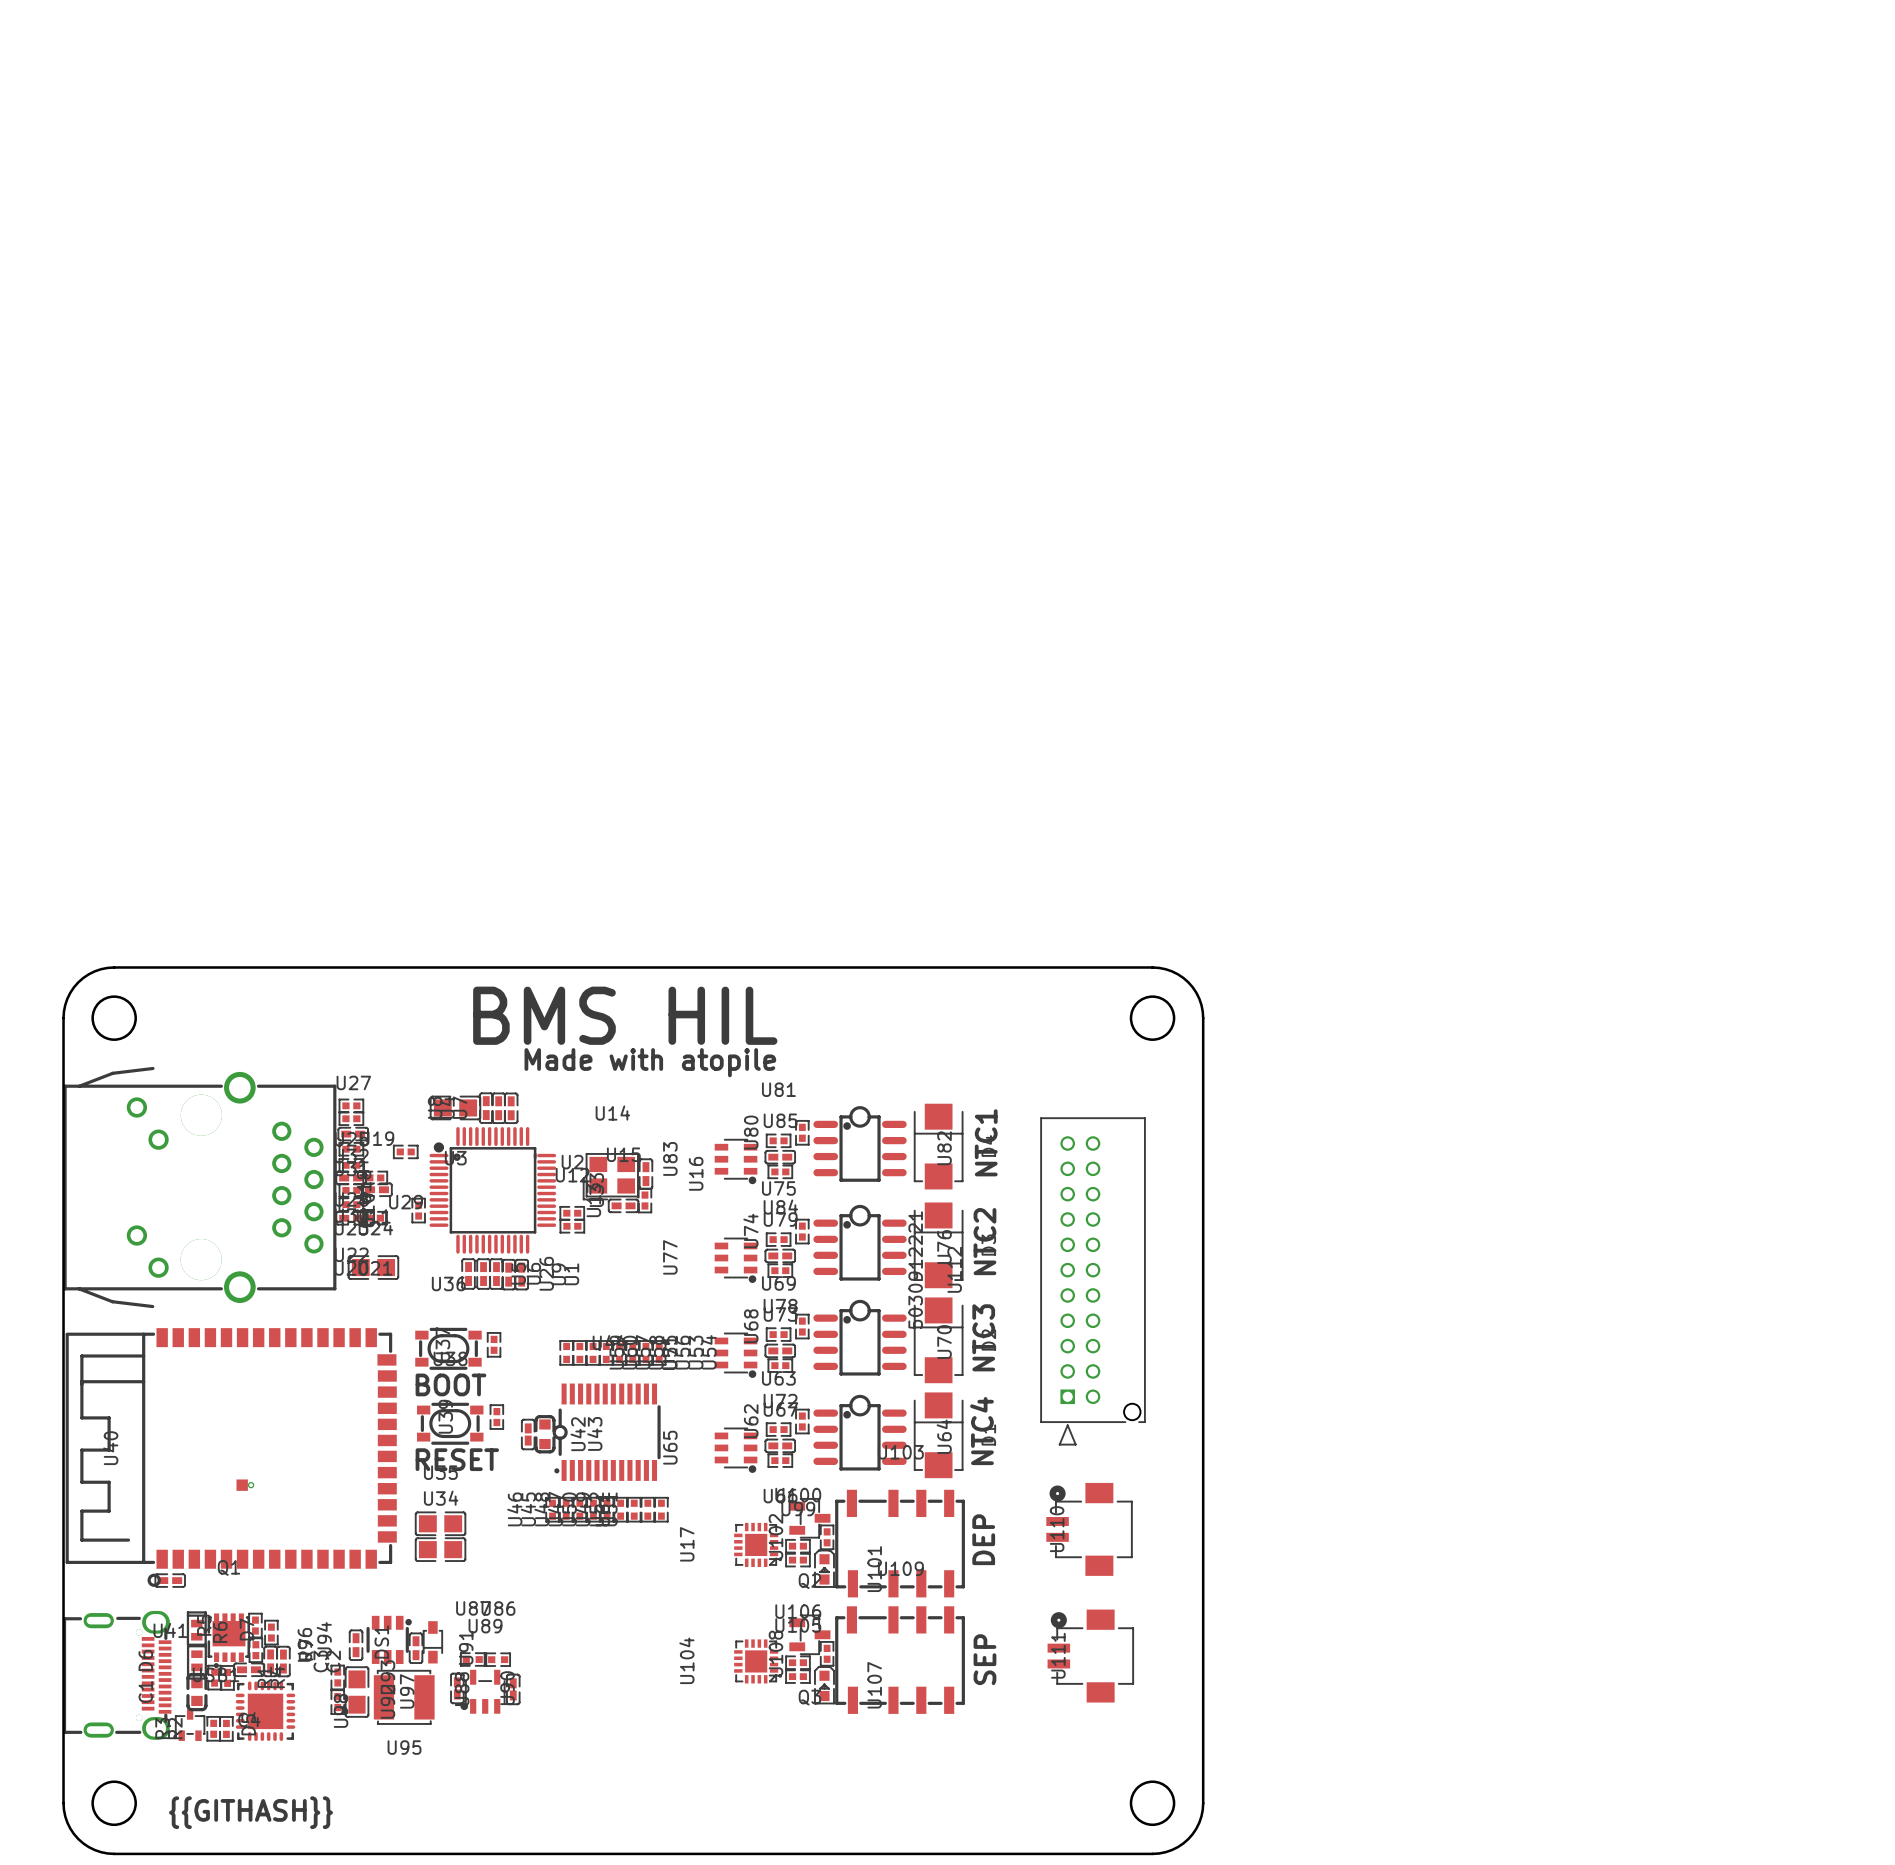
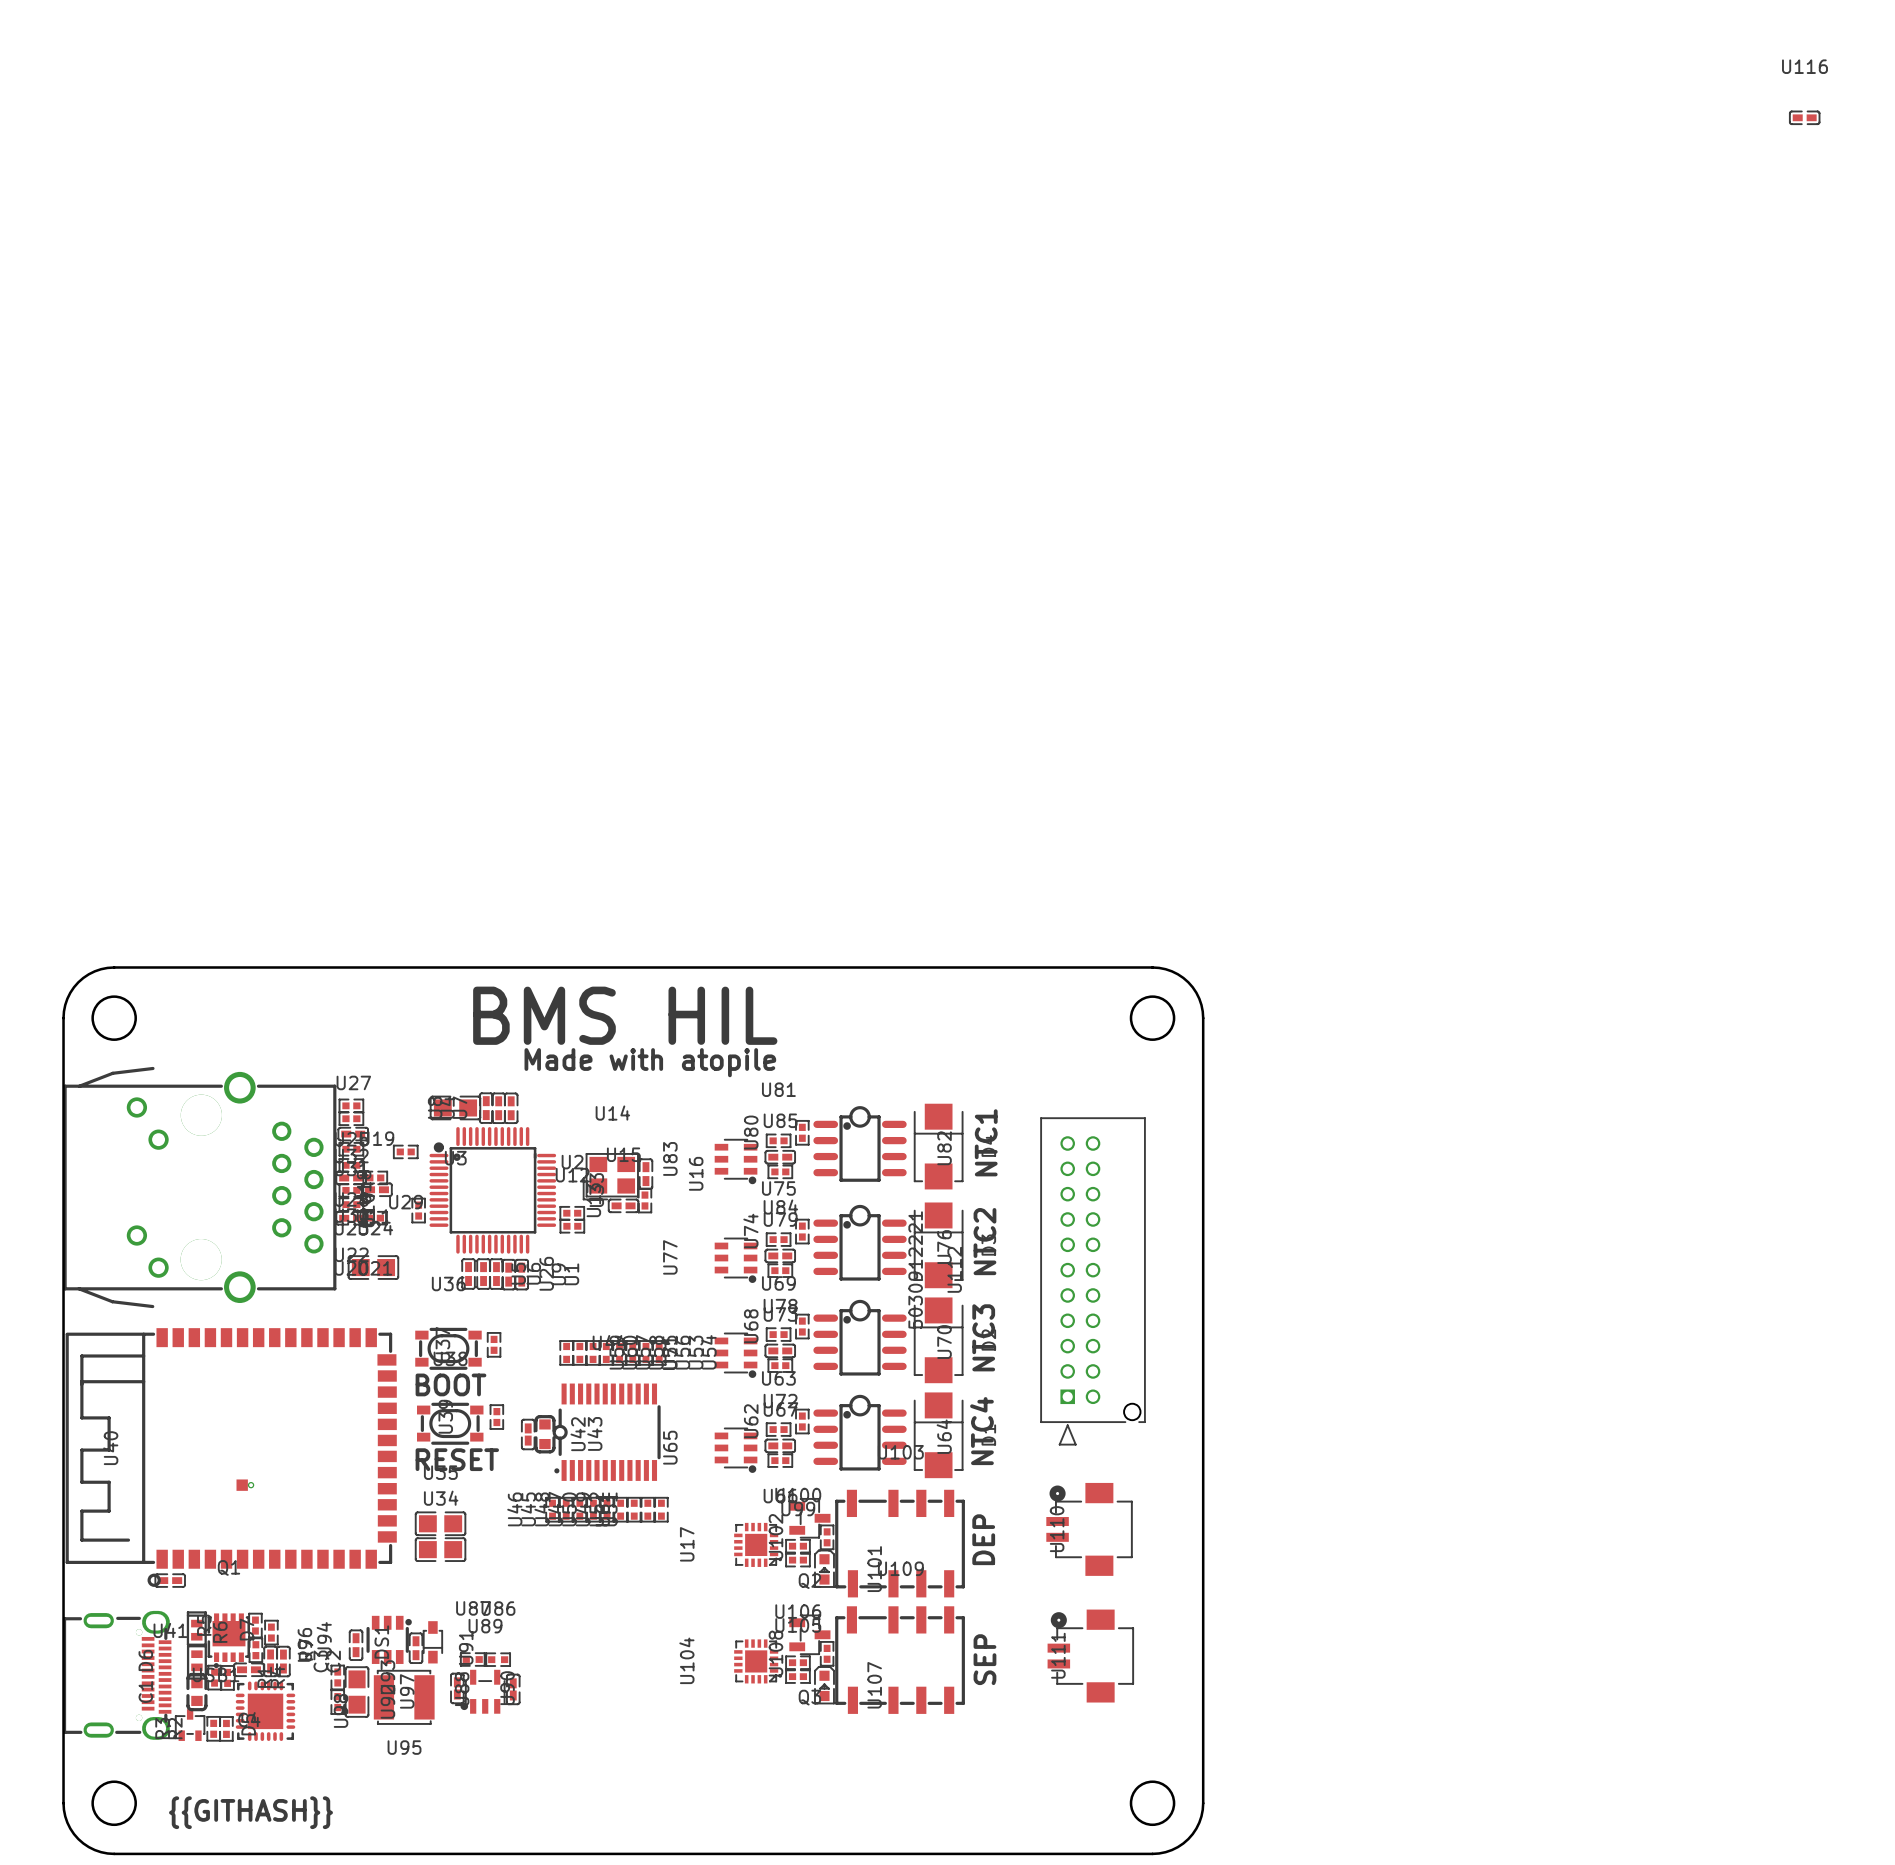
U116: none -> (1804, 117)

